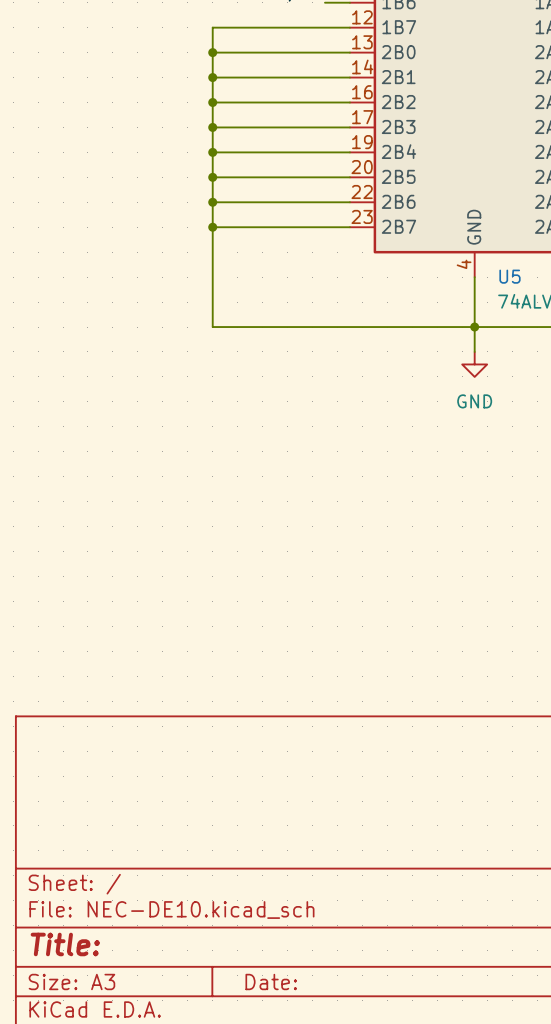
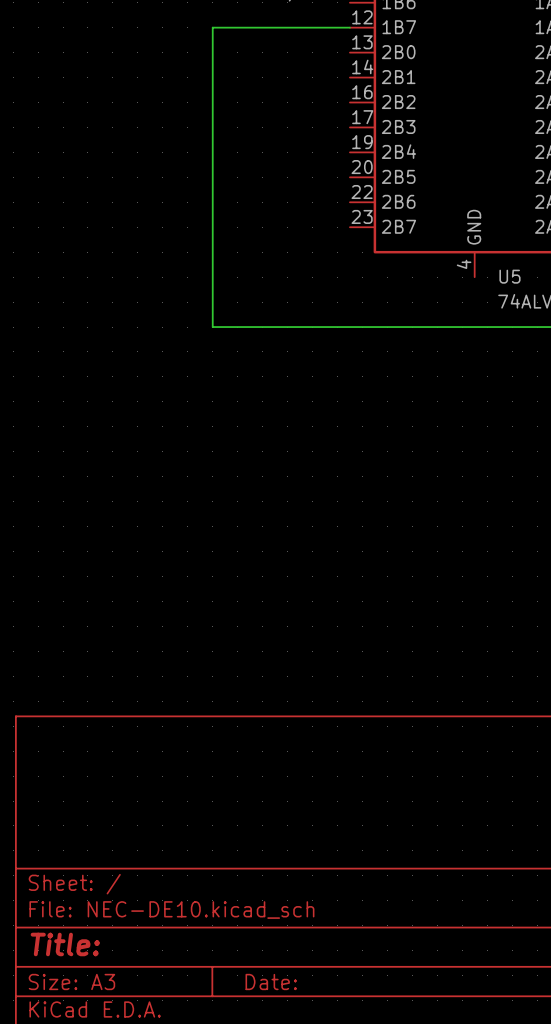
wire: (324, 2) (349, 2) -> none
wire: (212, 52) (349, 52) -> none
junction: (212, 52) -> none
wire: (212, 77) (349, 77) -> none
junction: (212, 77) -> none
wire: (212, 102) (349, 102) -> none
junction: (212, 102) -> none
wire: (212, 127) (349, 127) -> none
junction: (212, 127) -> none
wire: (212, 152) (349, 152) -> none
junction: (212, 152) -> none
wire: (212, 177) (349, 177) -> none
junction: (212, 177) -> none
wire: (212, 202) (349, 202) -> none
junction: (212, 202) -> none
wire: (212, 227) (349, 227) -> none
junction: (212, 227) -> none
wire: (474, 277) (474, 351) -> none
junction: (474, 327) -> none
power symbol: GND (474, 364) -> none

